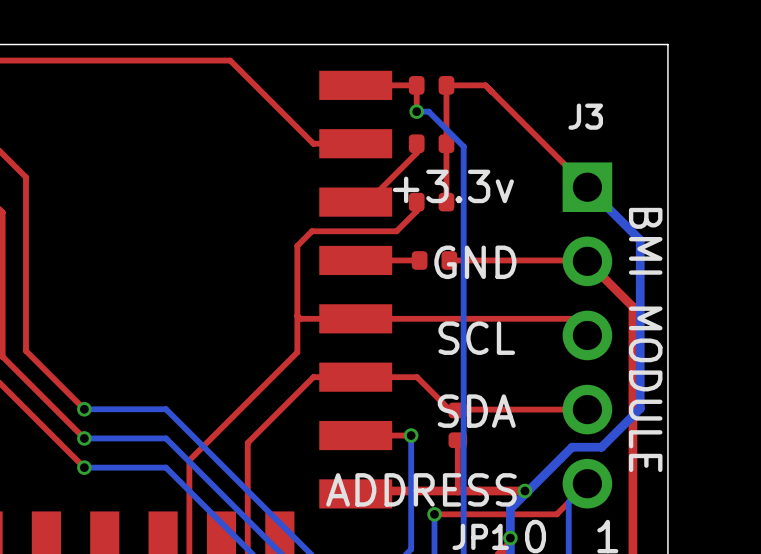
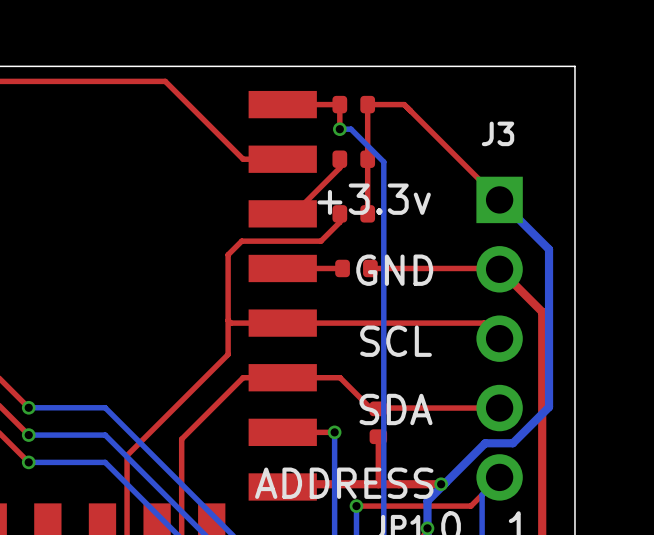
text: BMI MODULE (645, 339) -> none

